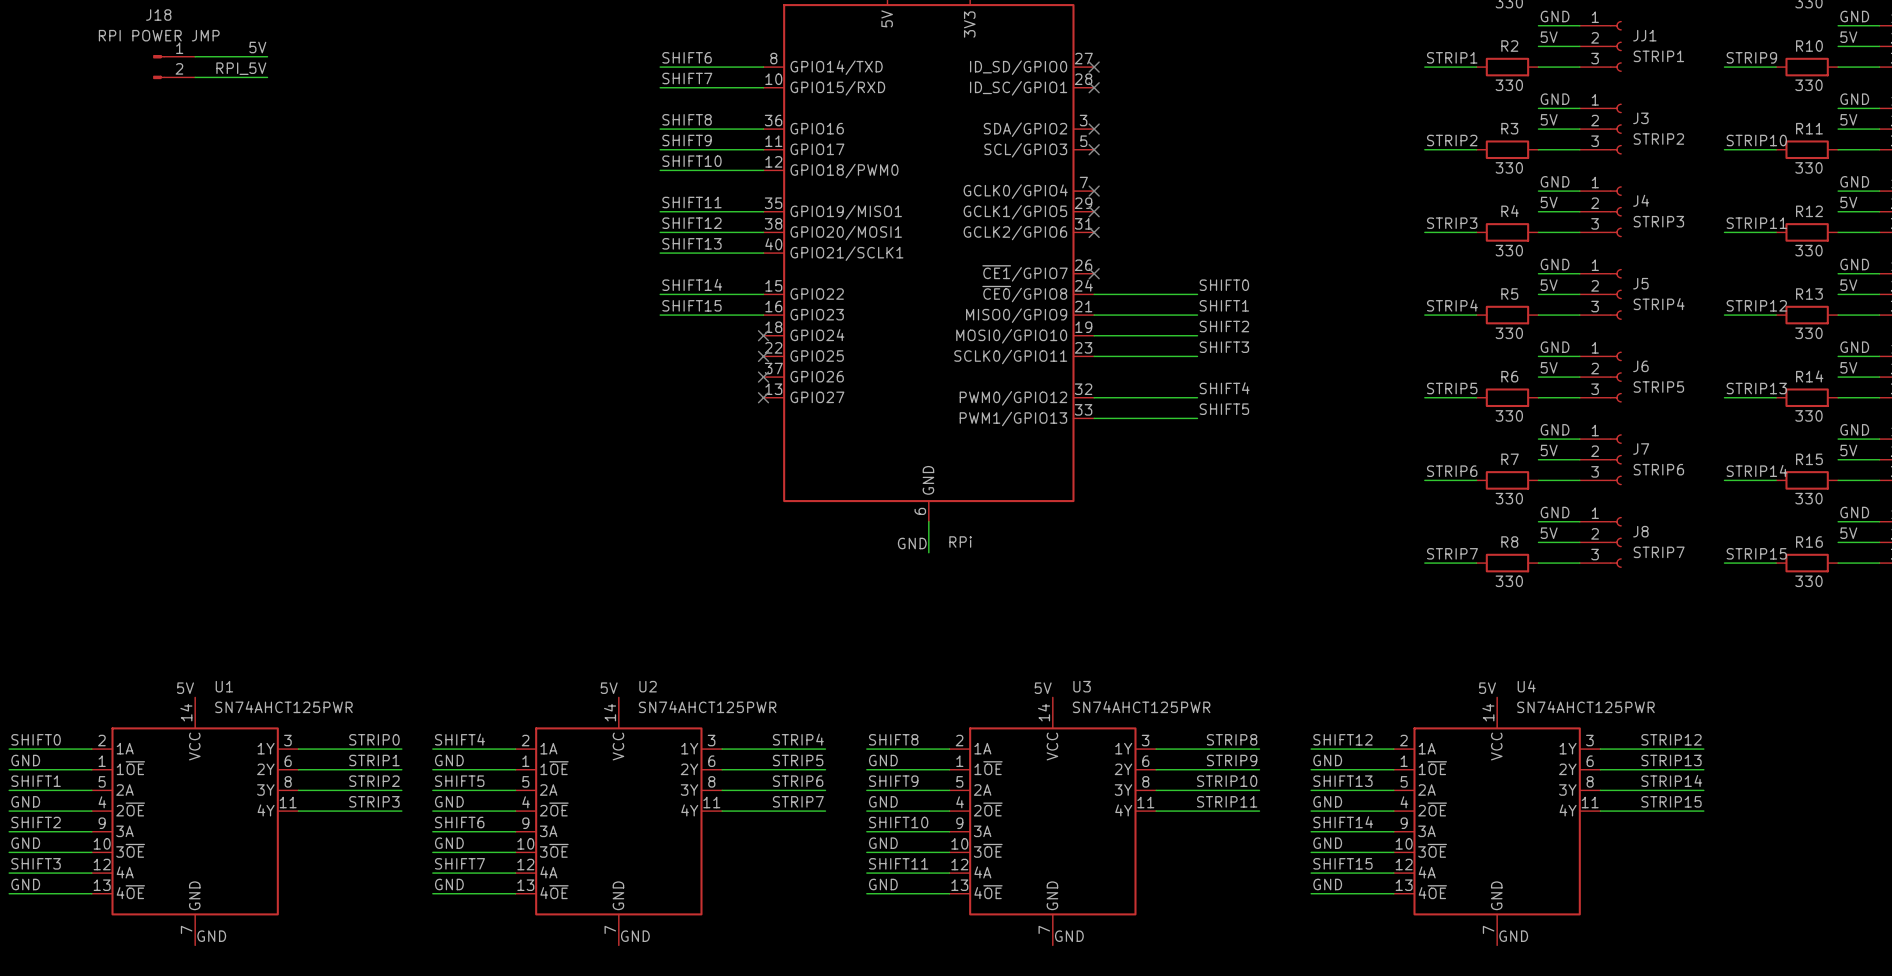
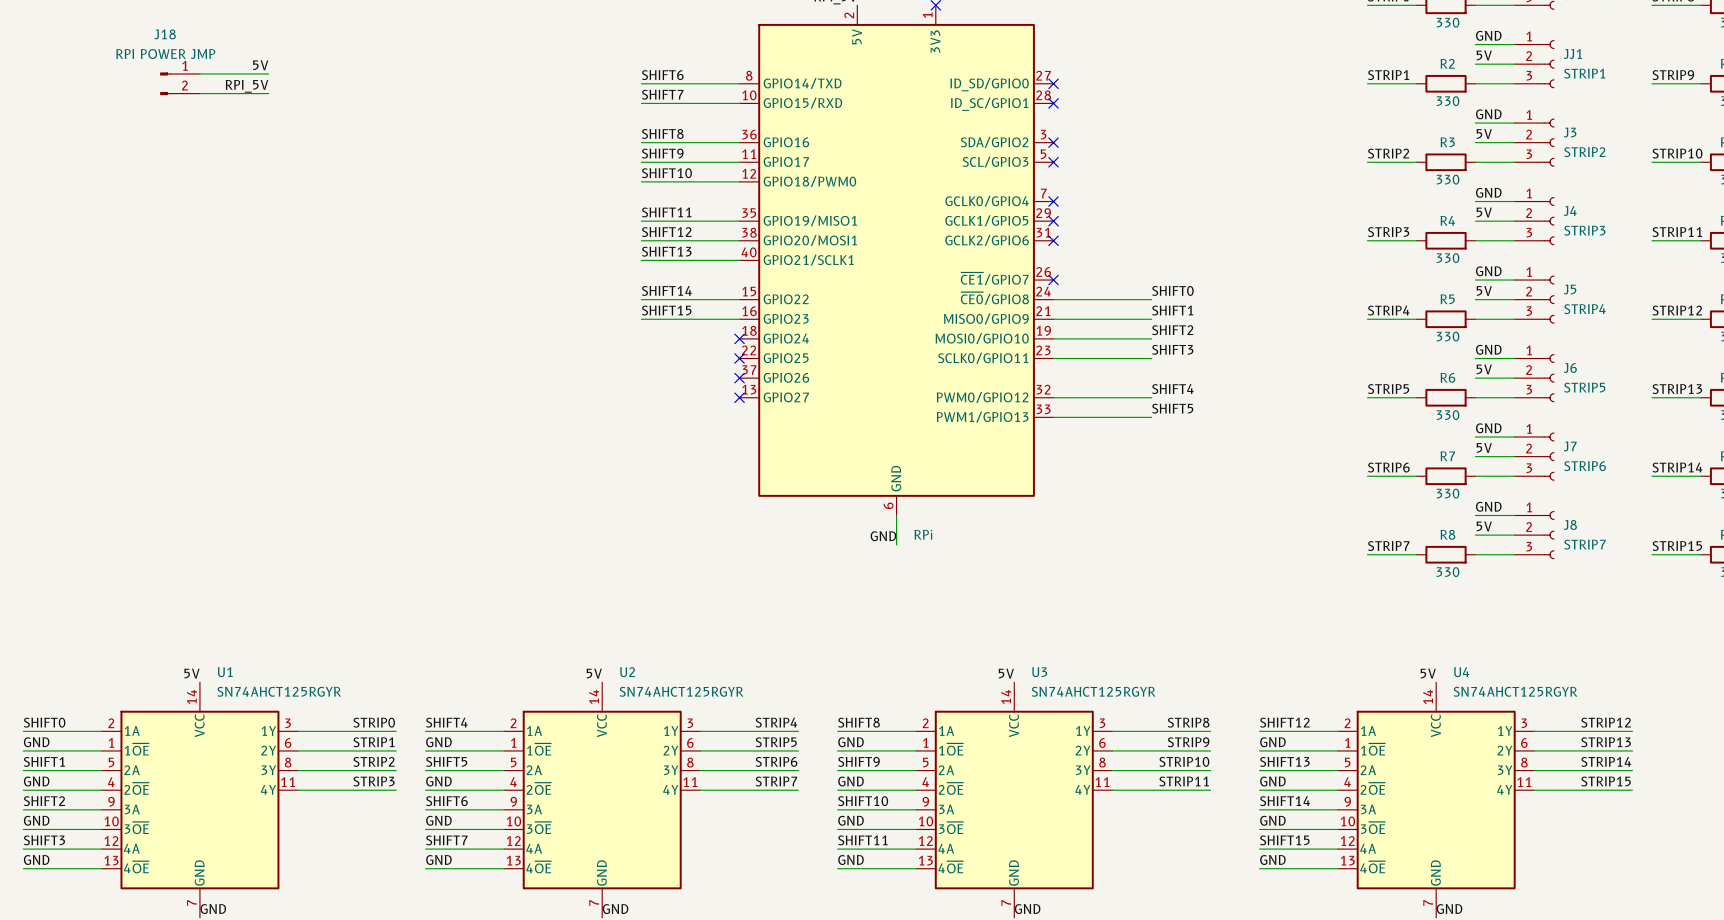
U1 value: SN74AHCT125PWR (283, 707) -> SN74AHCT125RGYR (279, 691)
U2 value: SN74AHCT125PWR (707, 707) -> SN74AHCT125RGYR (681, 691)
U3 value: SN74AHCT125PWR (1141, 707) -> SN74AHCT125RGYR (1093, 691)
U4 value: SN74AHCT125PWR (1585, 707) -> SN74AHCT125RGYR (1515, 691)

